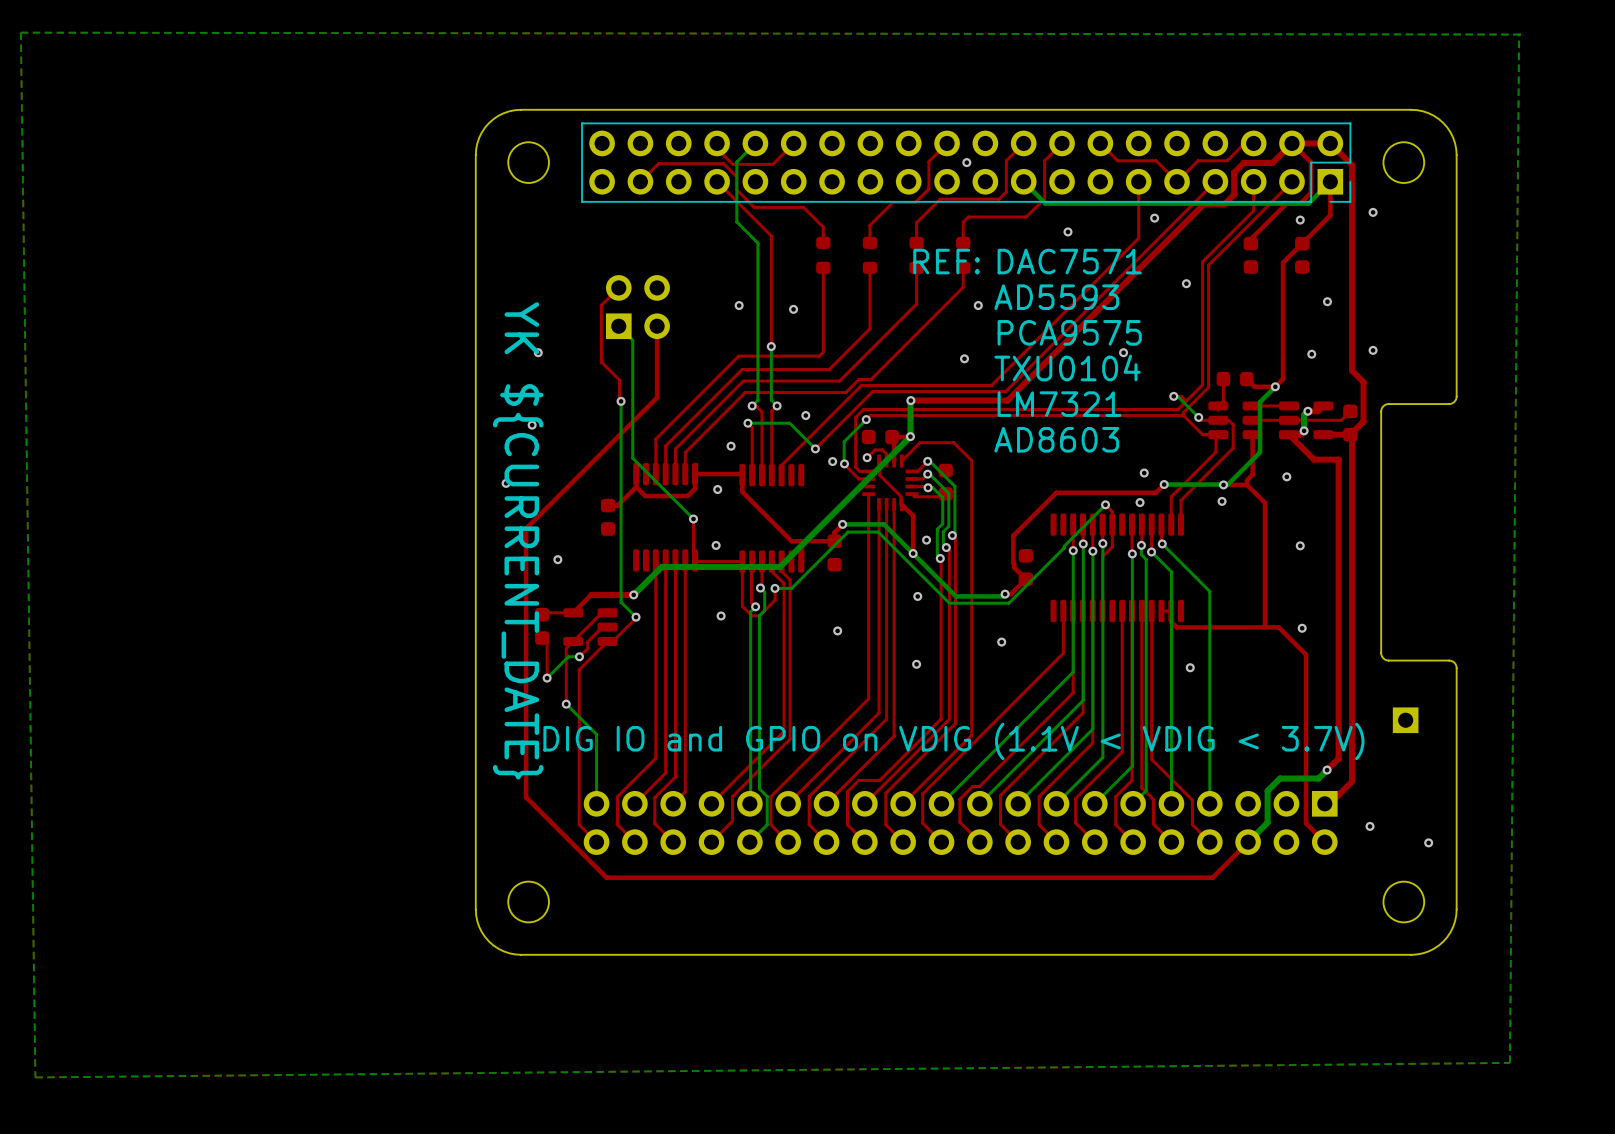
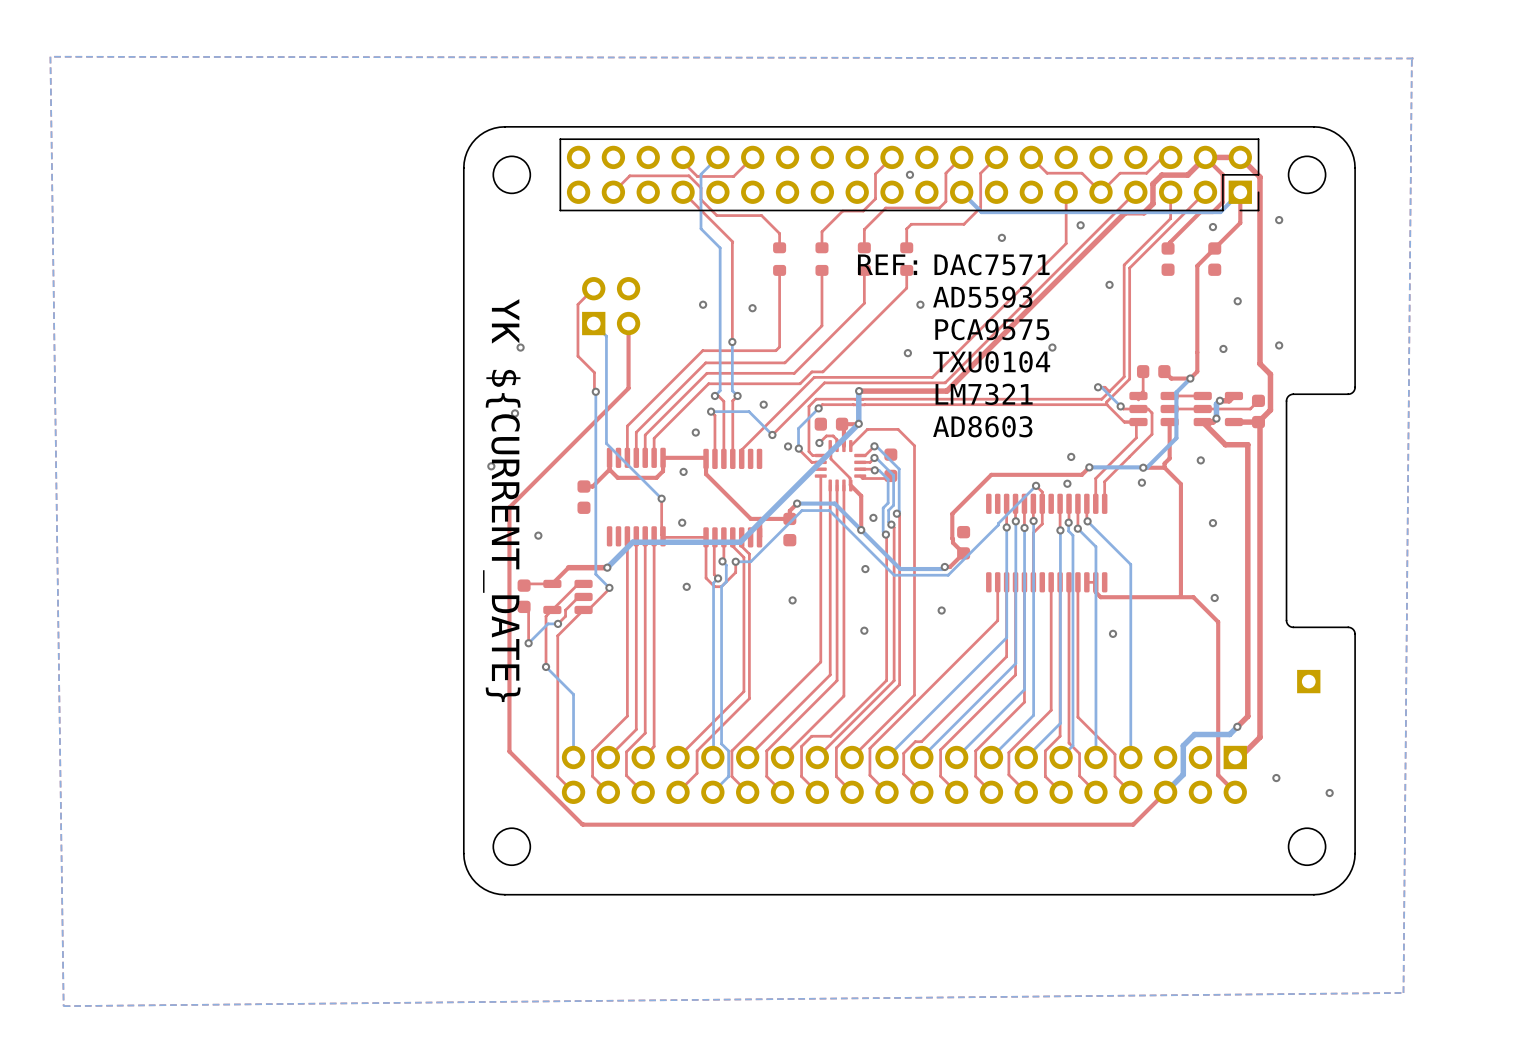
text: DIG IO and GPIO on VDIG (1.1V < VDIG < 3.7V) (953, 741) -> none

